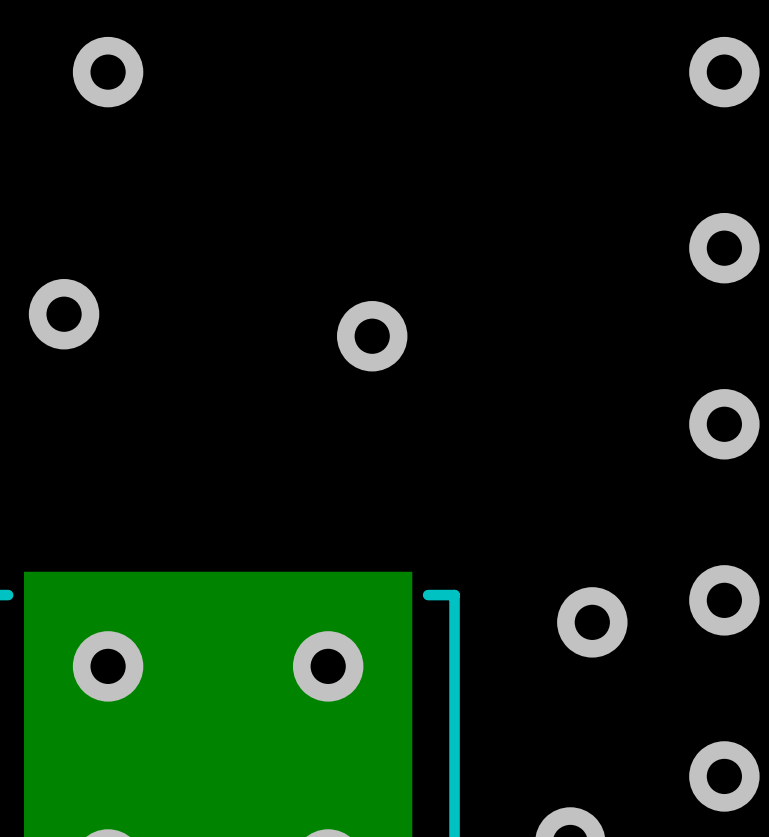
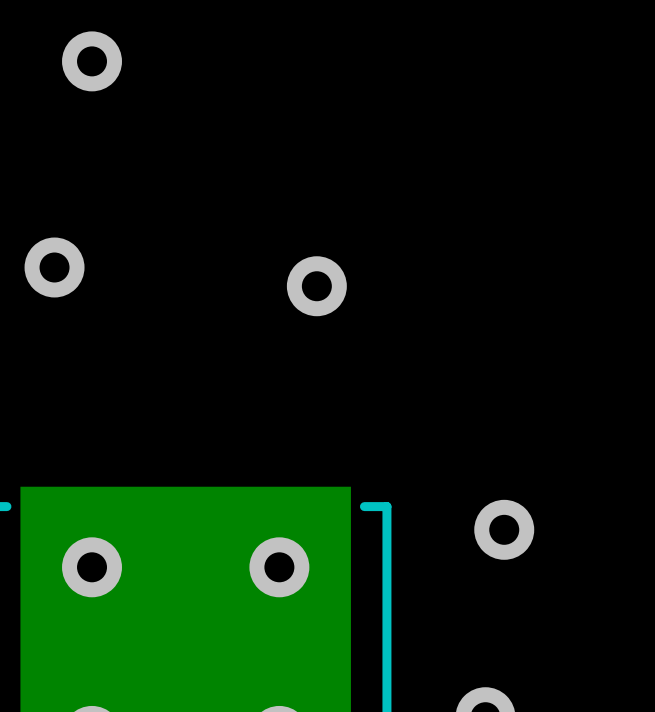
via: (724, 72) -> none
via: (724, 248) -> none
via: (724, 424) -> none
via: (724, 600) -> none
via: (724, 776) -> none

